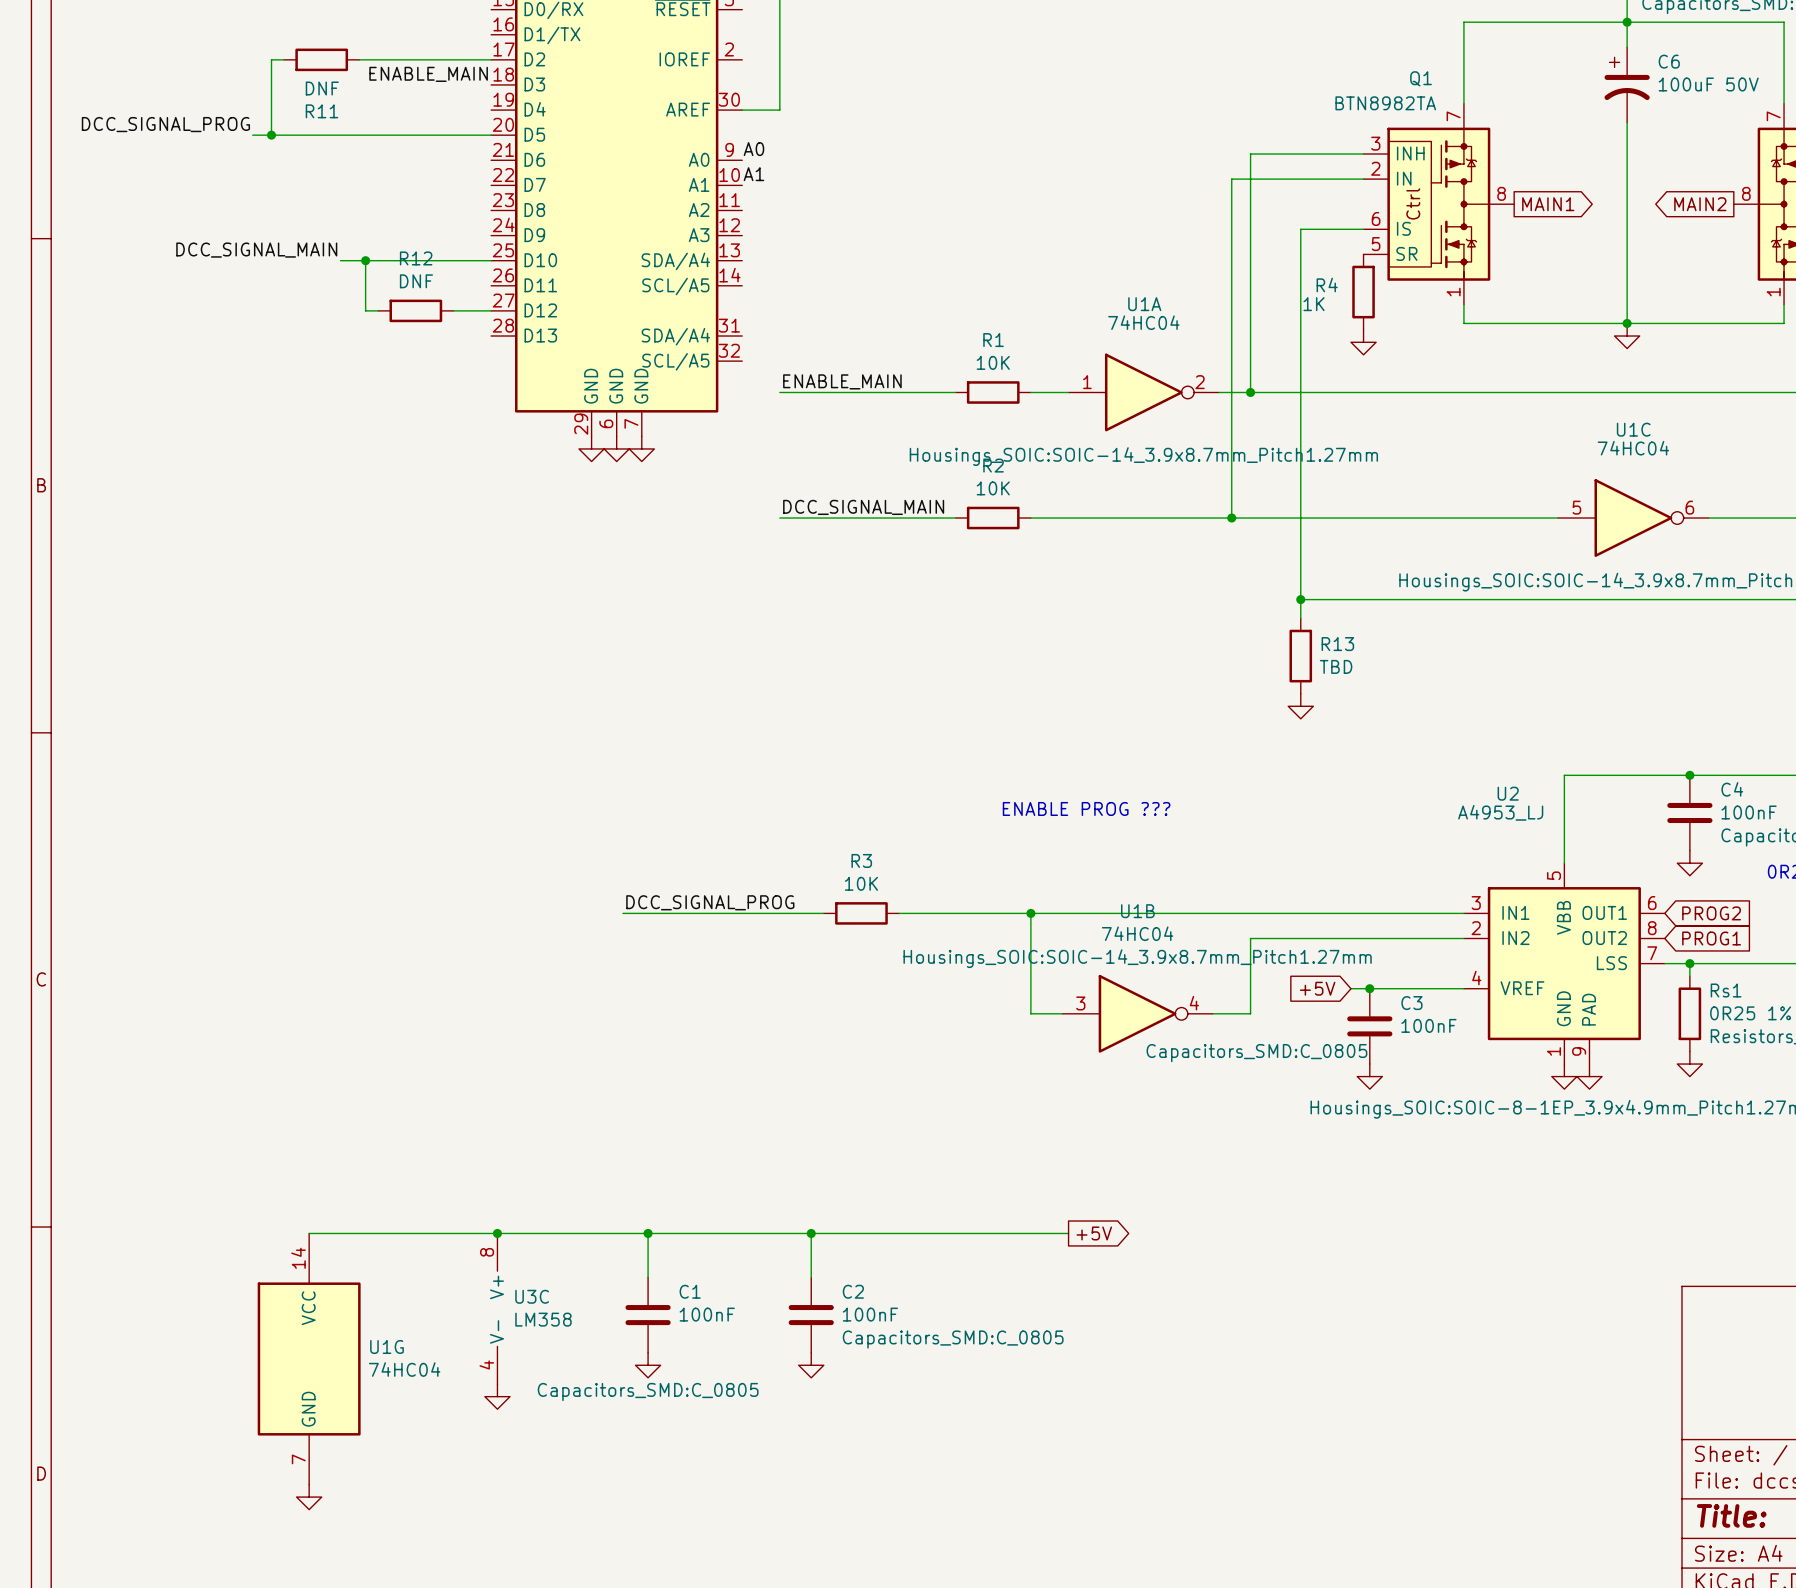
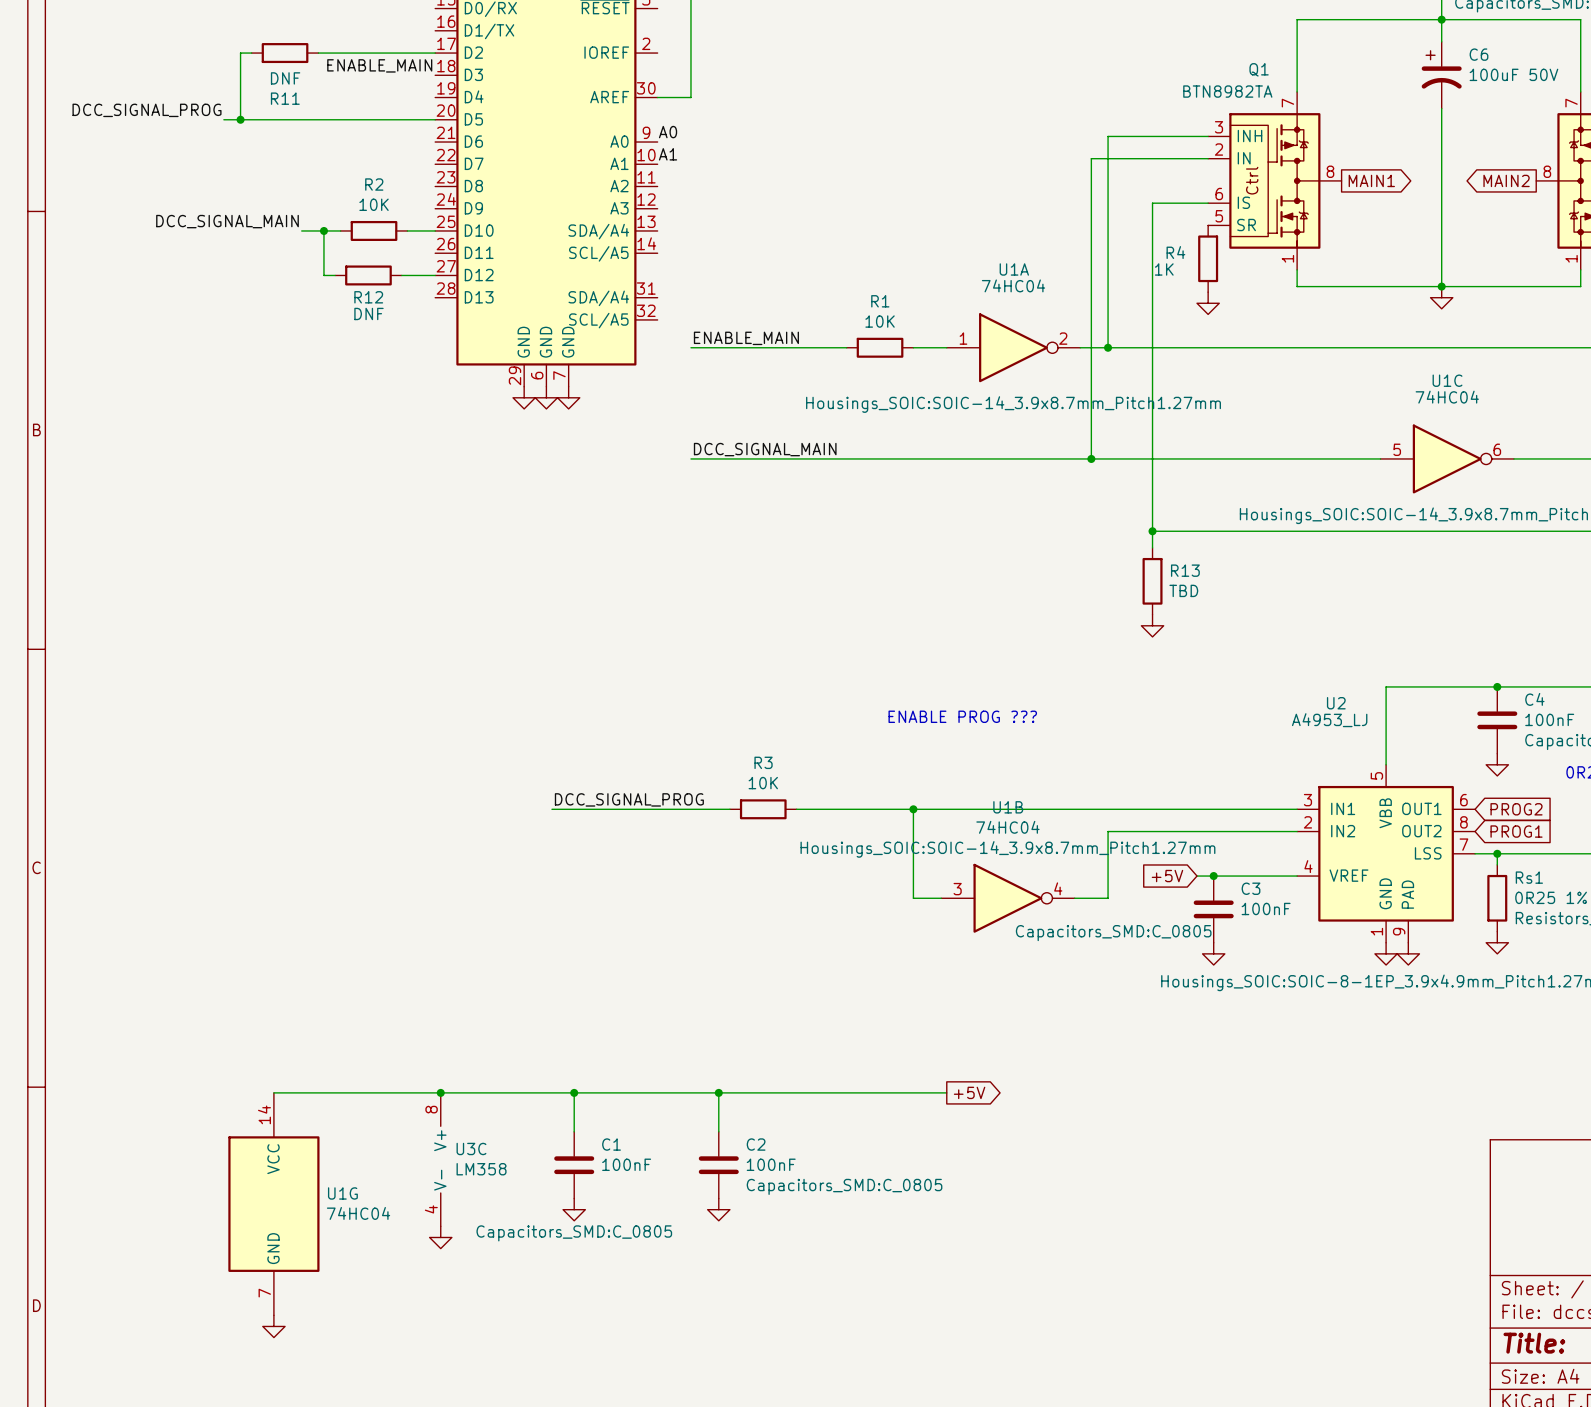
R12 name position: R12 (416, 258) -> R12 (368, 297)
wire: (384, 260) (459, 260) -> none
R12 value position: DNF (416, 281) -> DNF (368, 313)
wire: none -> (846, 458) (913, 458)
R2 position: (993, 518) -> (374, 230)

